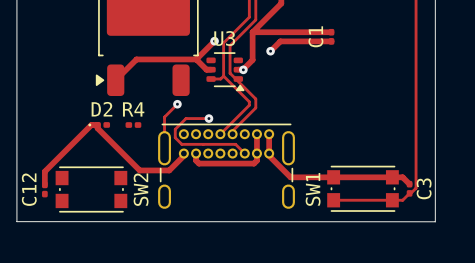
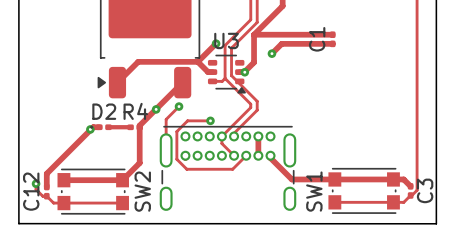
track: none -> (182, 82) (139, 125) (139, 163) (122, 180) (63, 180)
via: none -> (156, 109)
track: (97, 124) (97, 128) (139, 170) (169, 170) (183, 155) -> none
track: none -> (108, 127) (130, 127)
via: none -> (90, 129)
track: none -> (221, 136) (221, 143) (234, 155)
track: (269, 134) (269, 153) -> none
track: (175, 137) (181, 144) (235, 144) (244, 153) -> (176, 139) (176, 159) (186, 169) (232, 169) (246, 155)
track: (196, 153) (196, 160) (199, 163) (254, 163) (256, 160) (256, 153) -> none
track: none -> (36, 183) (36, 189) (53, 203) (122, 203)
via: none -> (36, 183)

